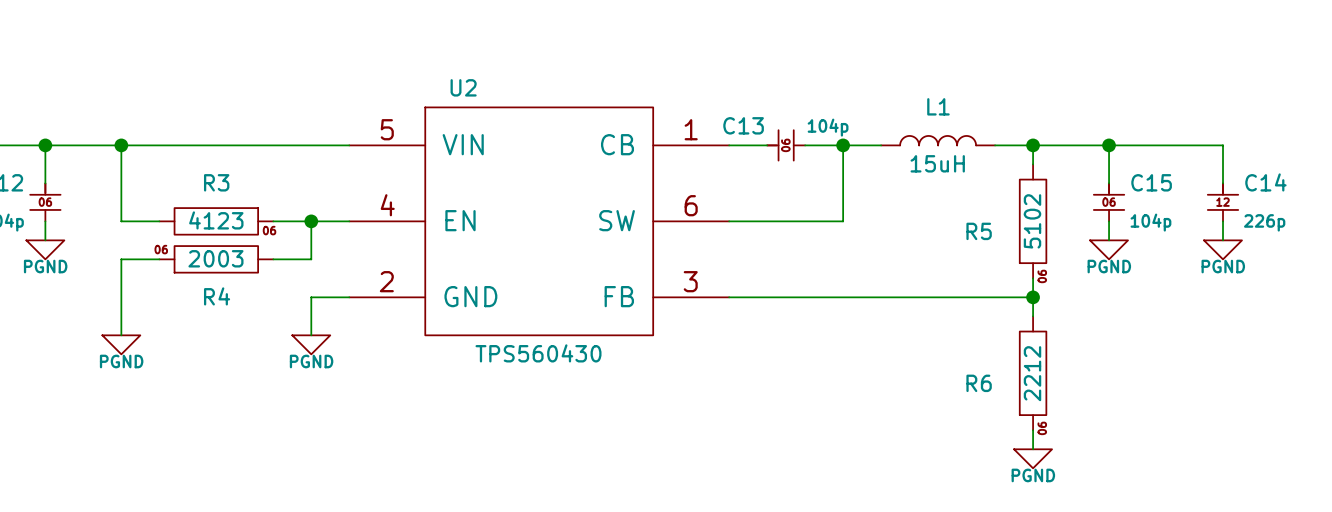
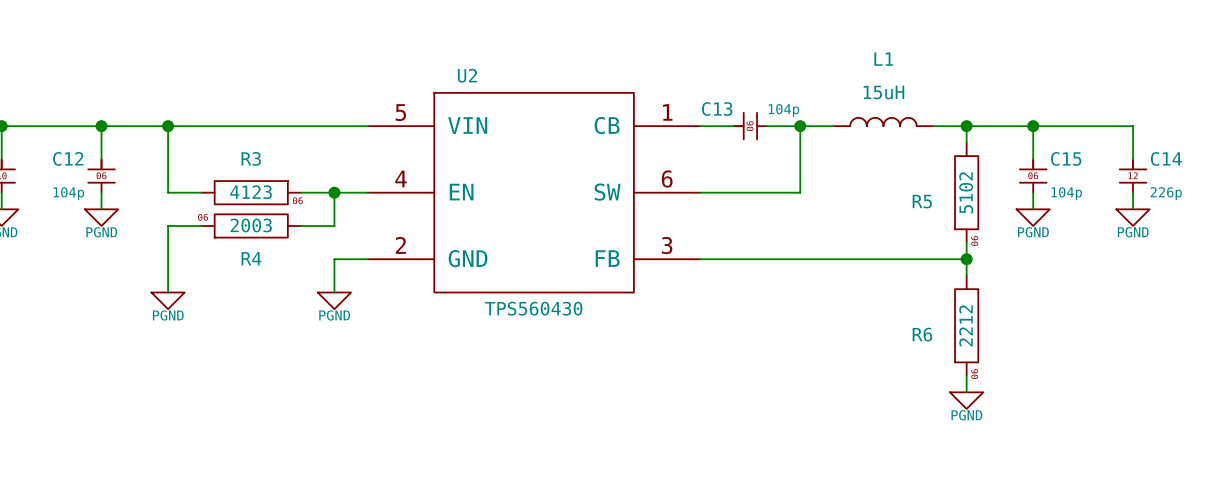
L1 name position: L1 (938, 106) -> L1 (883, 59)
L1 text position: 15uH (937, 163) -> 15uH (883, 92)

